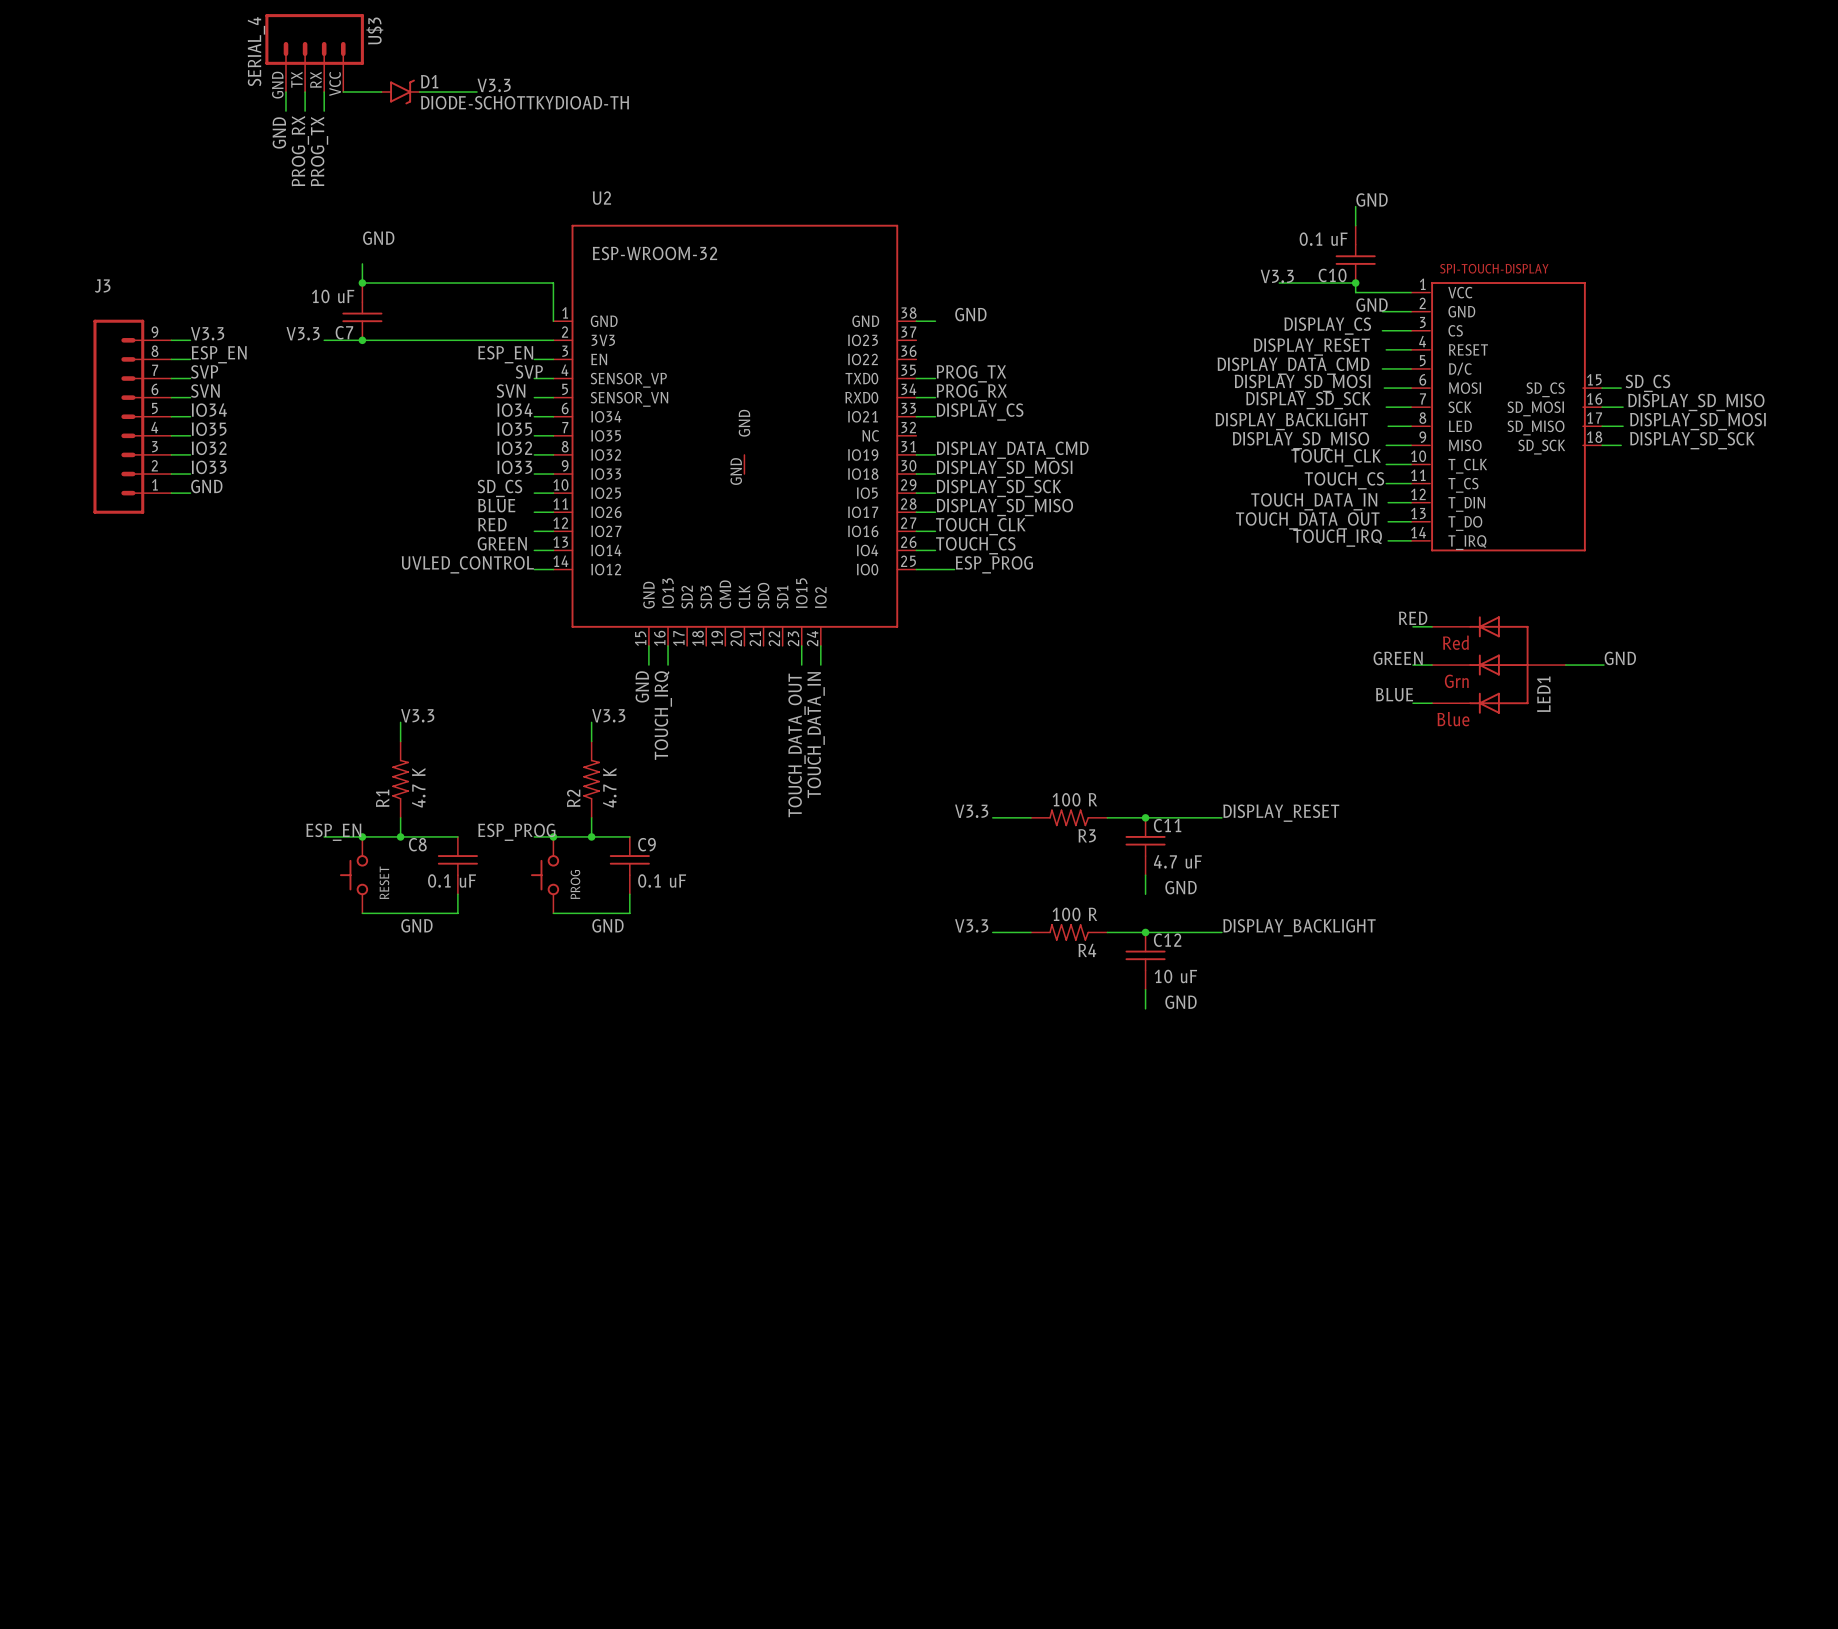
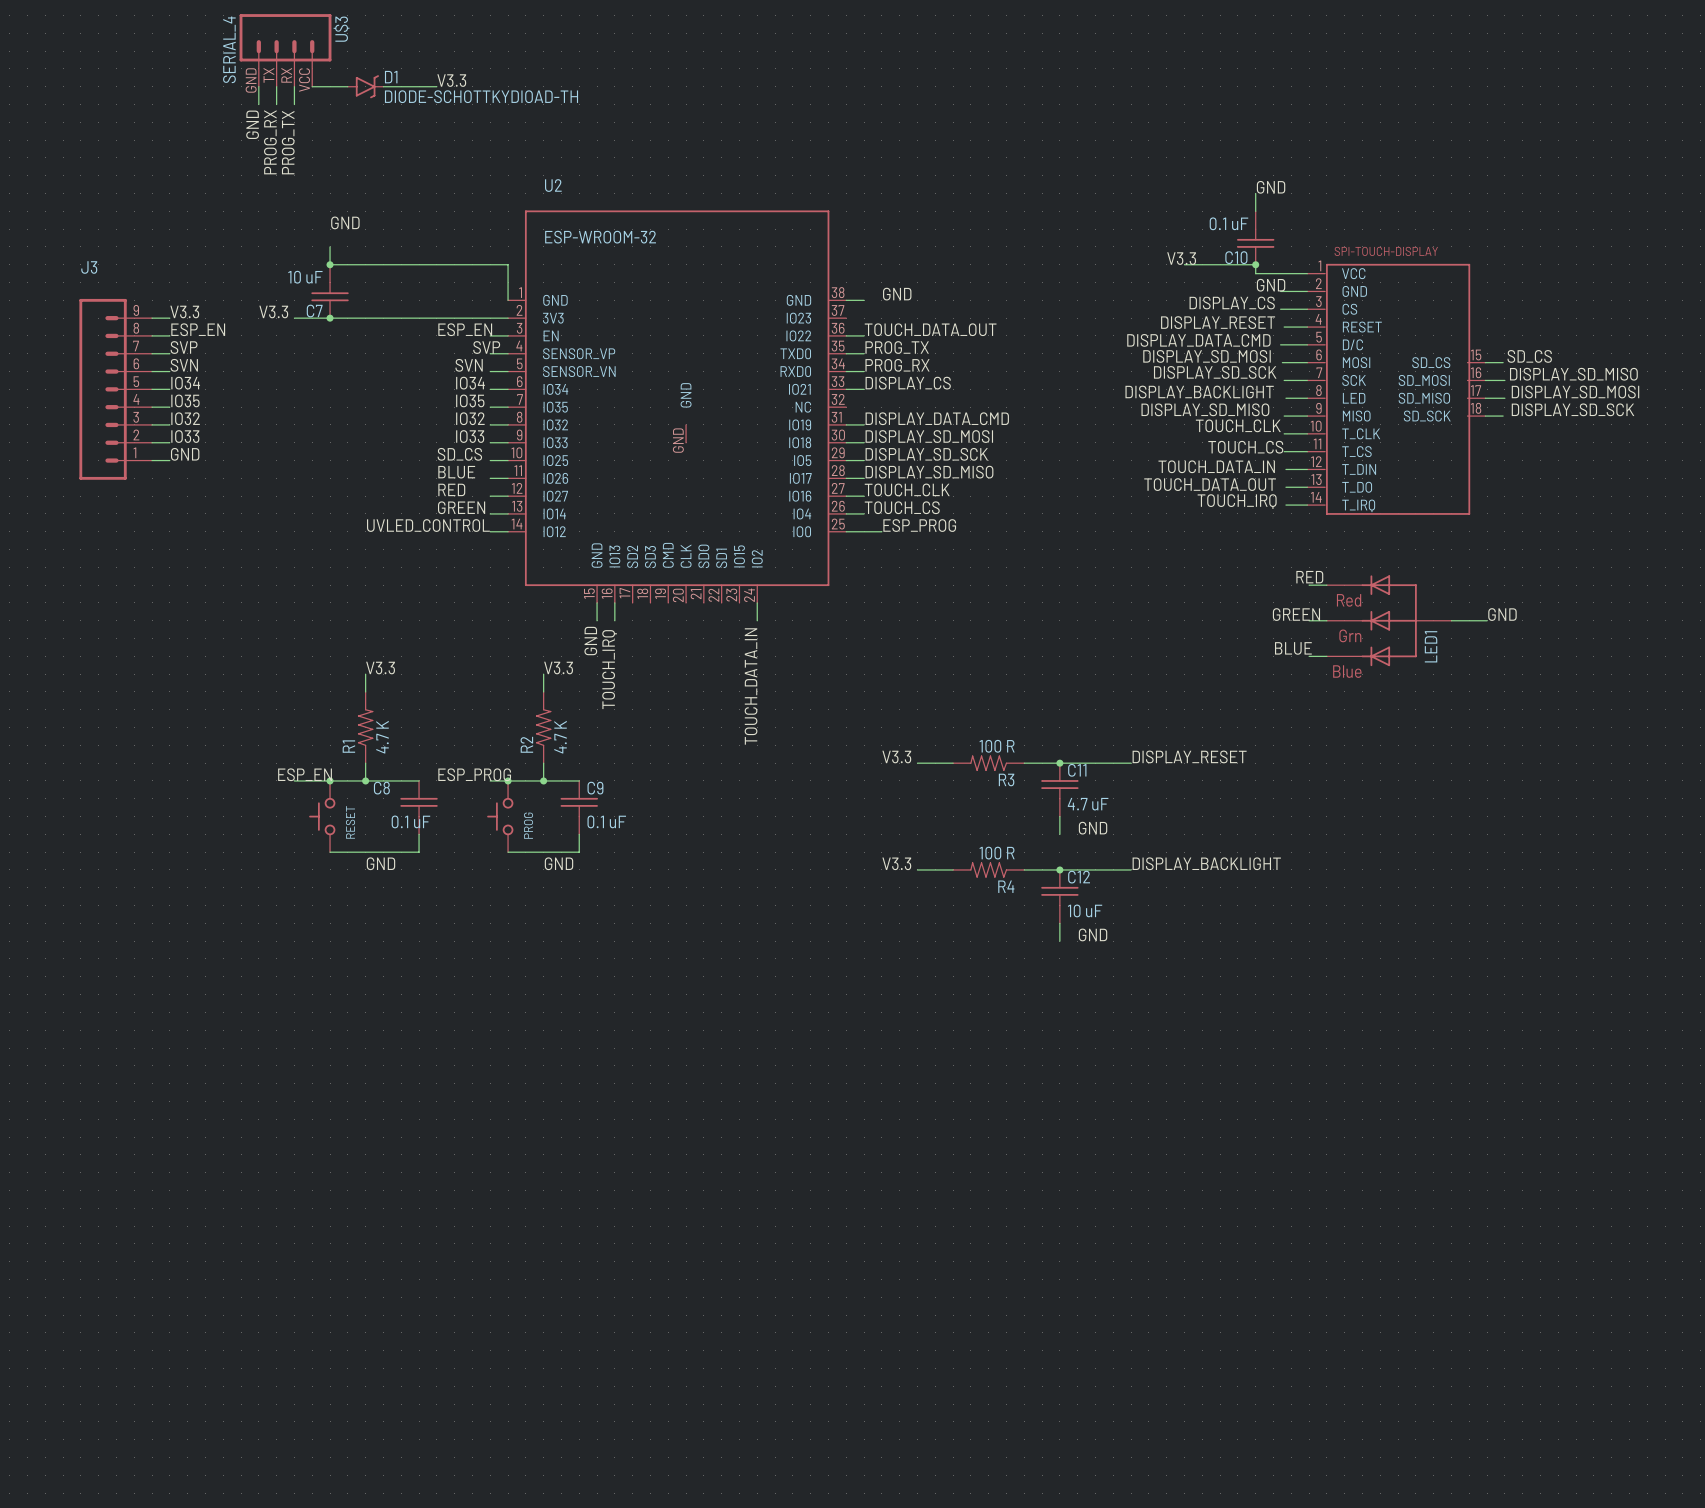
label: none -> TOUCH_DATA_OUT (930, 329)
wire: none -> (846, 335) (864, 335)
wire: (801, 645) (801, 665) -> none
label: TOUCH_DATA_OUT (797, 745) -> none

